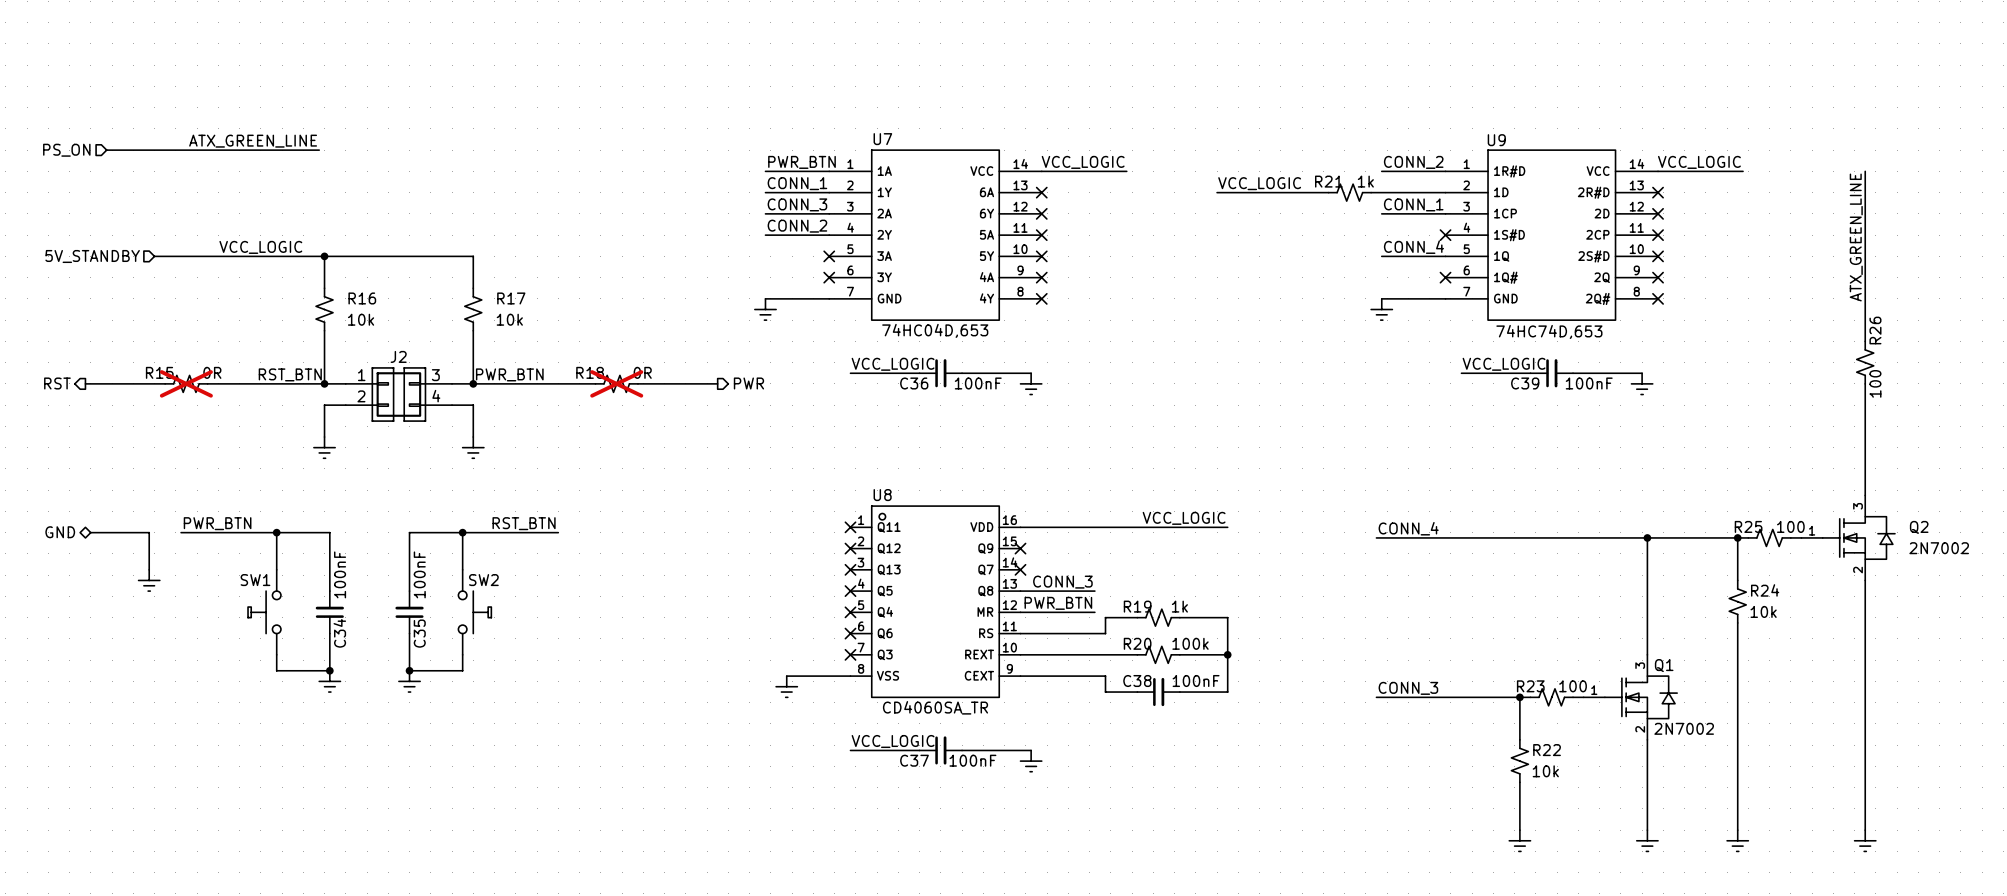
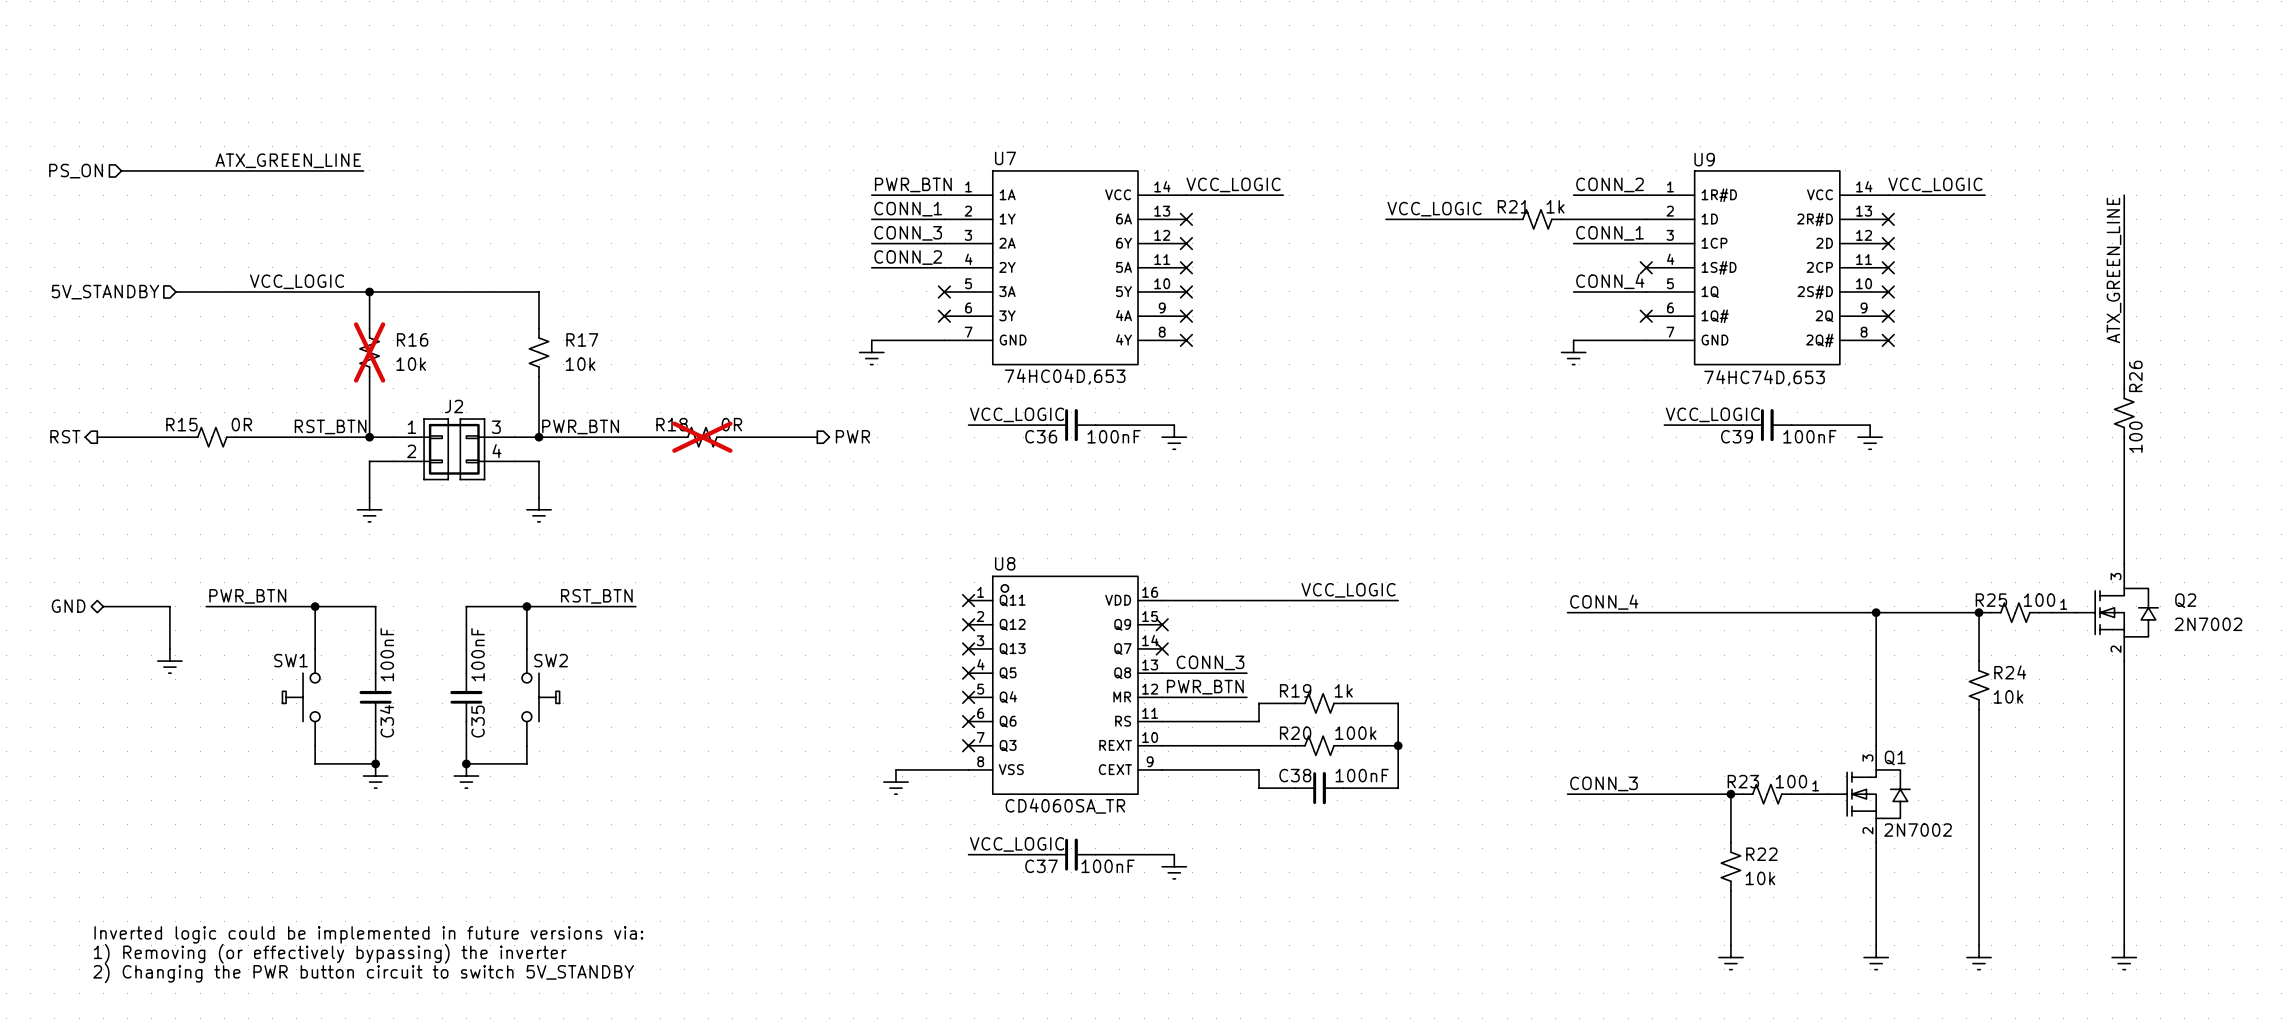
R16 do-not-place cross: none -> (369, 352)
R15 do-not-place cross: (186, 383) -> none
text: none -> Inverted logic could be implemented in future versions via: (368, 934)
text: none -> 1) Removing (or effectively bypassing) the inverter (330, 953)
text: none -> 2) Changing the PWR button circuit to switch 5V_STANDBY (363, 973)

